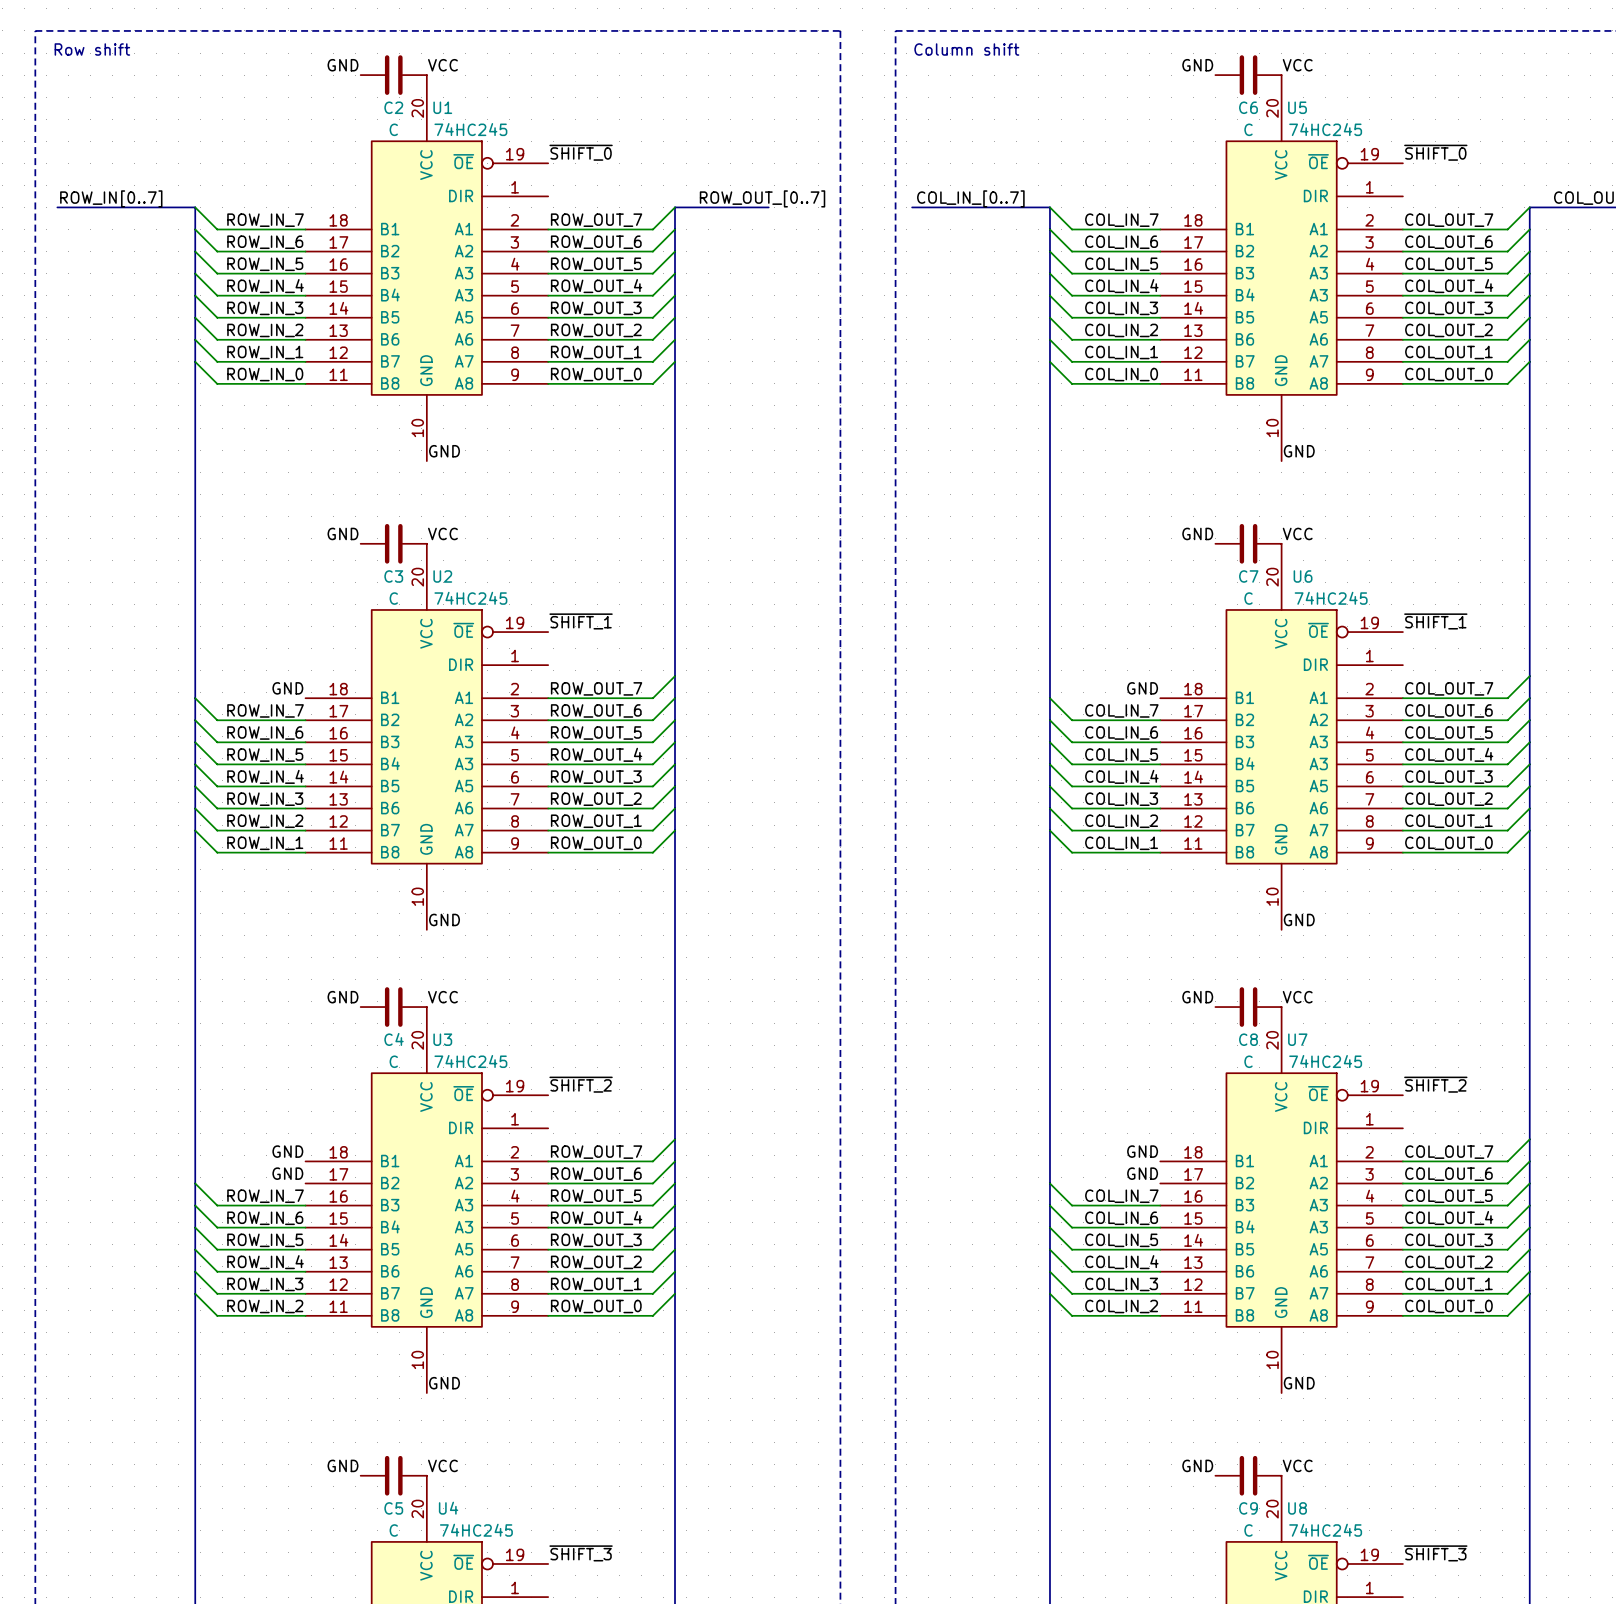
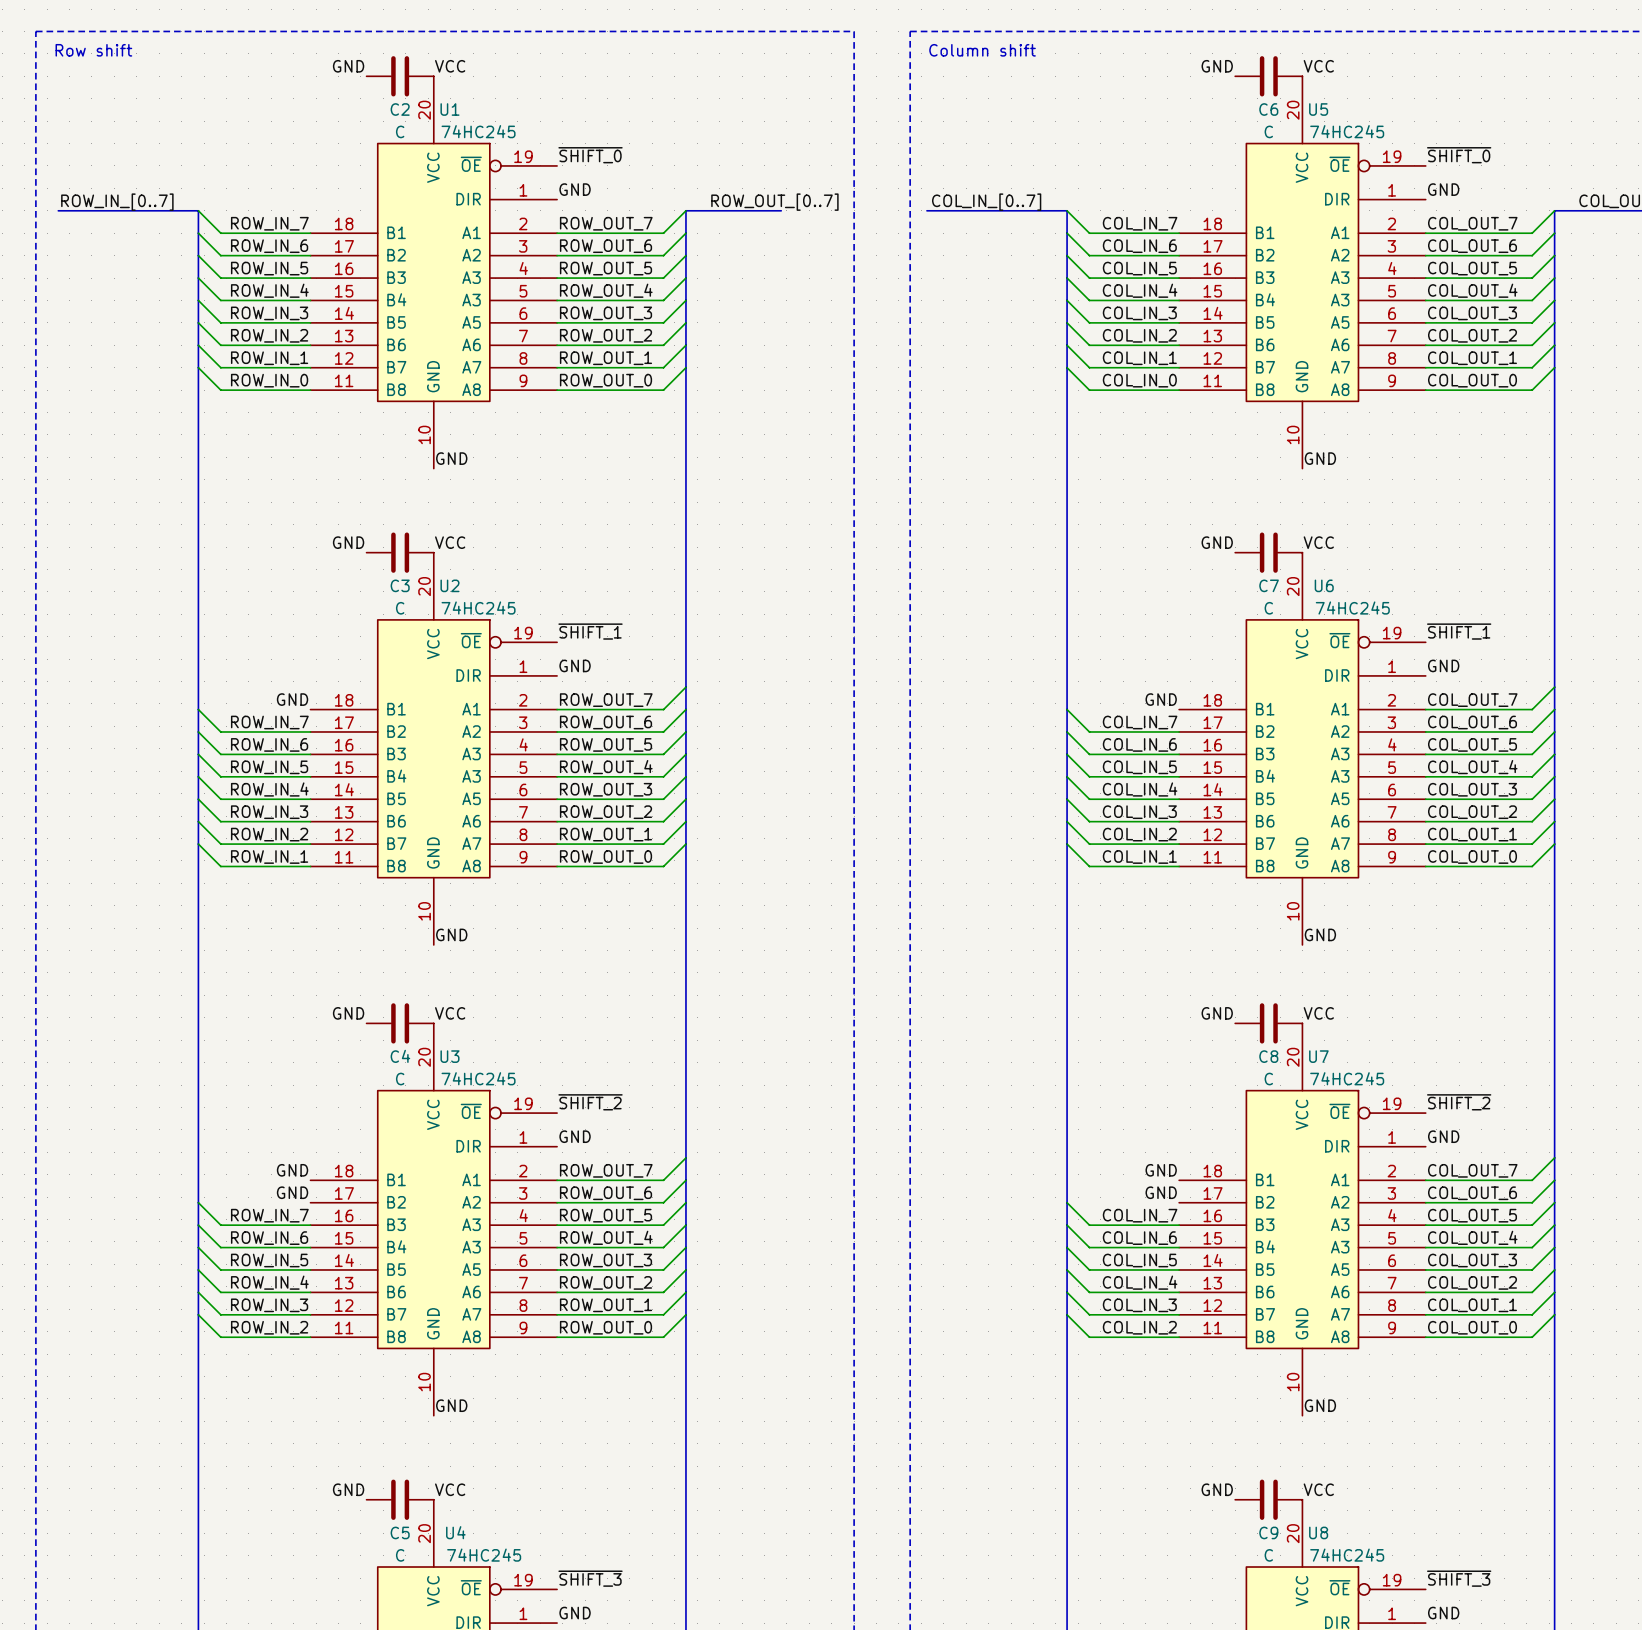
label: none -> GND (575, 189)
label: none -> GND (1443, 189)
label: ROW_IN[0..7] (111, 198) -> ROW_IN_[0..7] (117, 202)
label: none -> GND (575, 665)
label: none -> GND (1443, 665)
label: none -> GND (575, 1136)
label: none -> GND (1443, 1136)
label: none -> GND (575, 1613)
label: none -> GND (1443, 1613)

